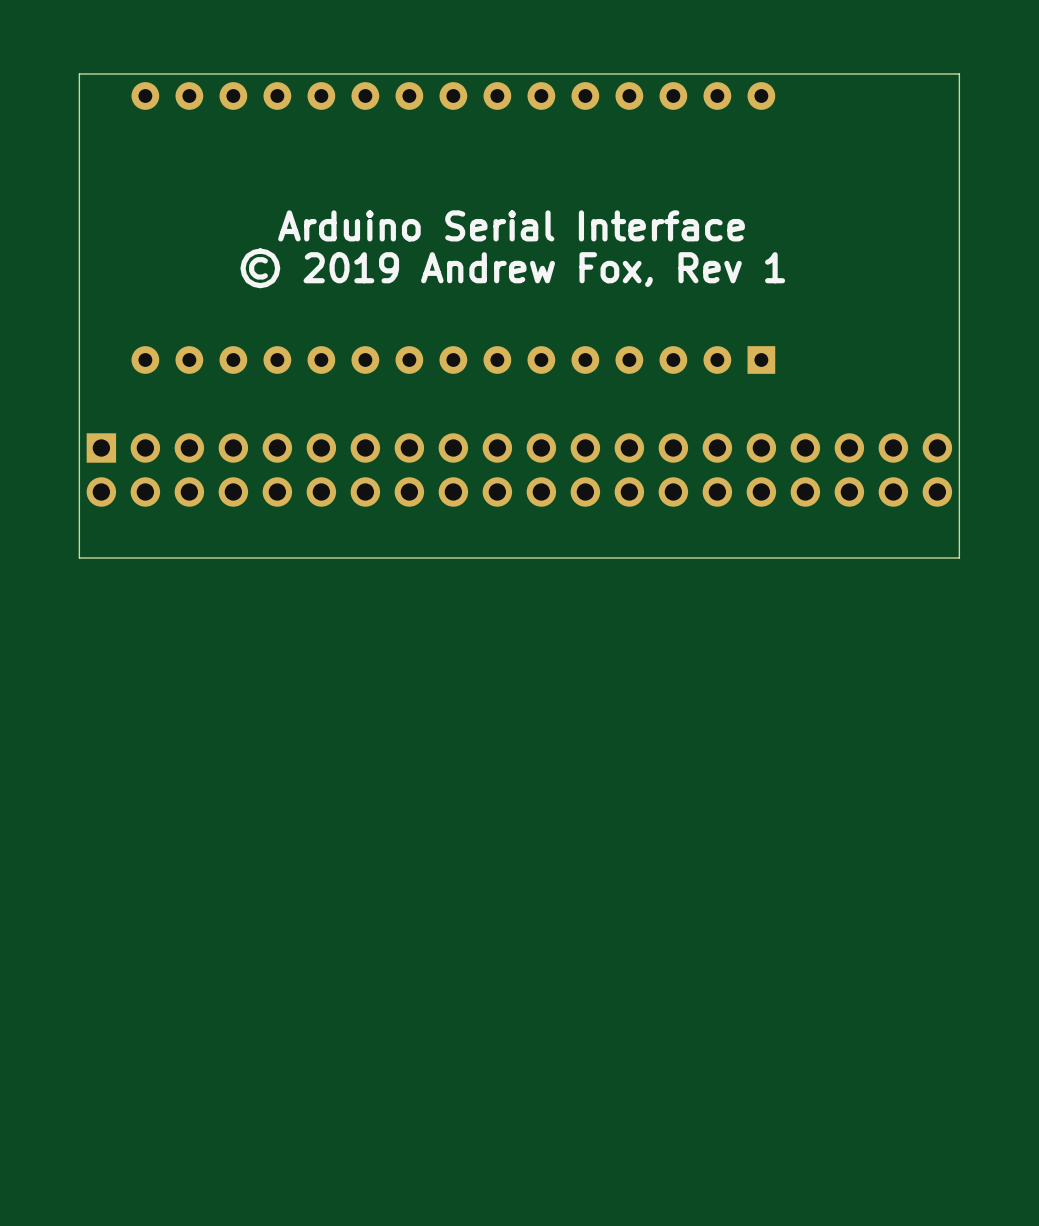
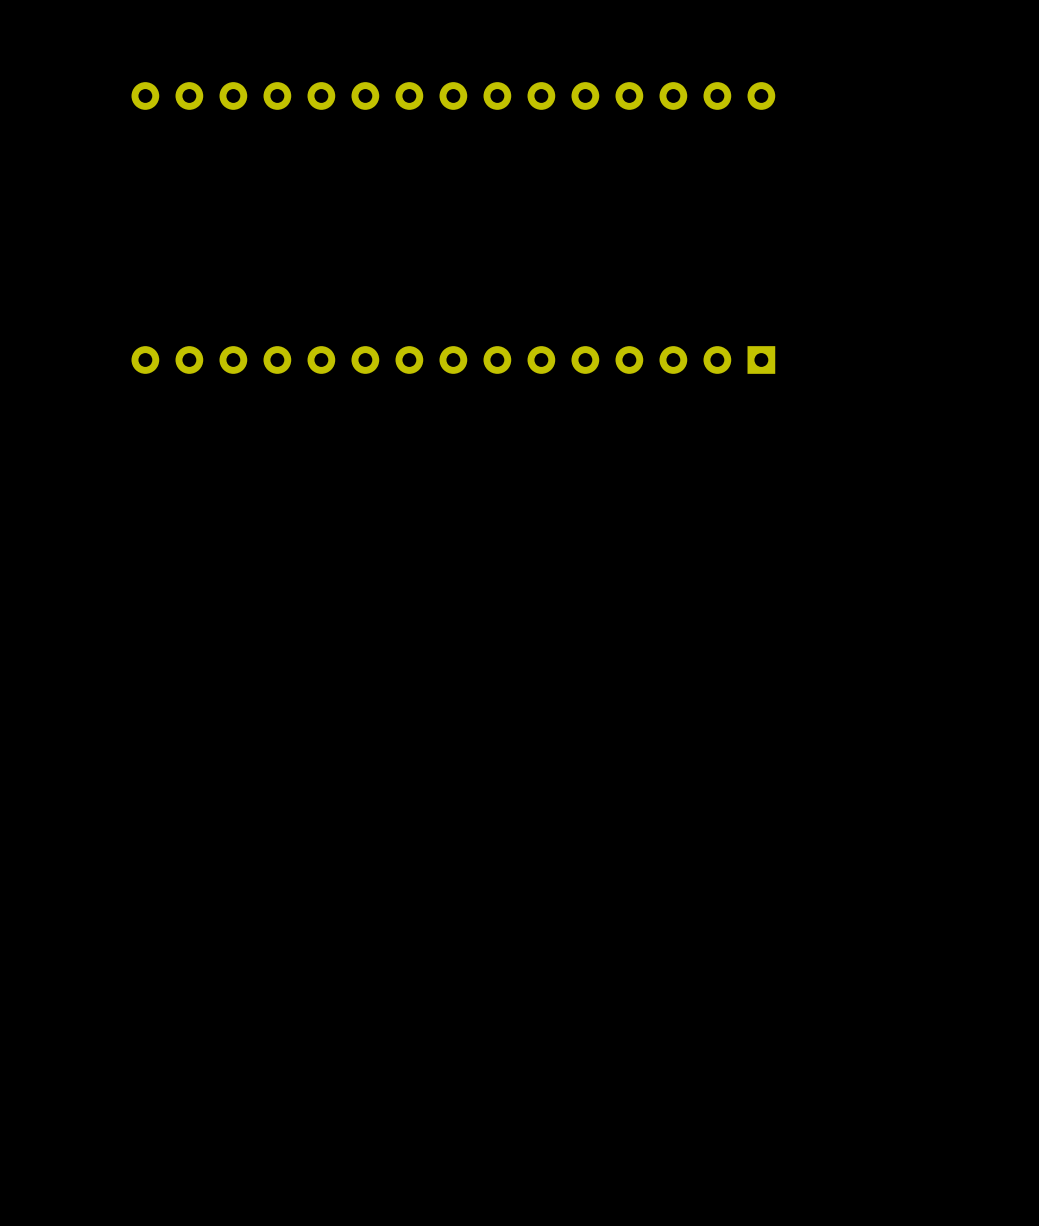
board edge: (959, 73) (959, 557) (79, 557) (79, 73) (959, 73) -> none
text: Arduino Serial Interface (511, 225) -> none
text: © 2019 Andrew Fox, Rev 1 (512, 268) -> none
part: (519, 469) -> none

